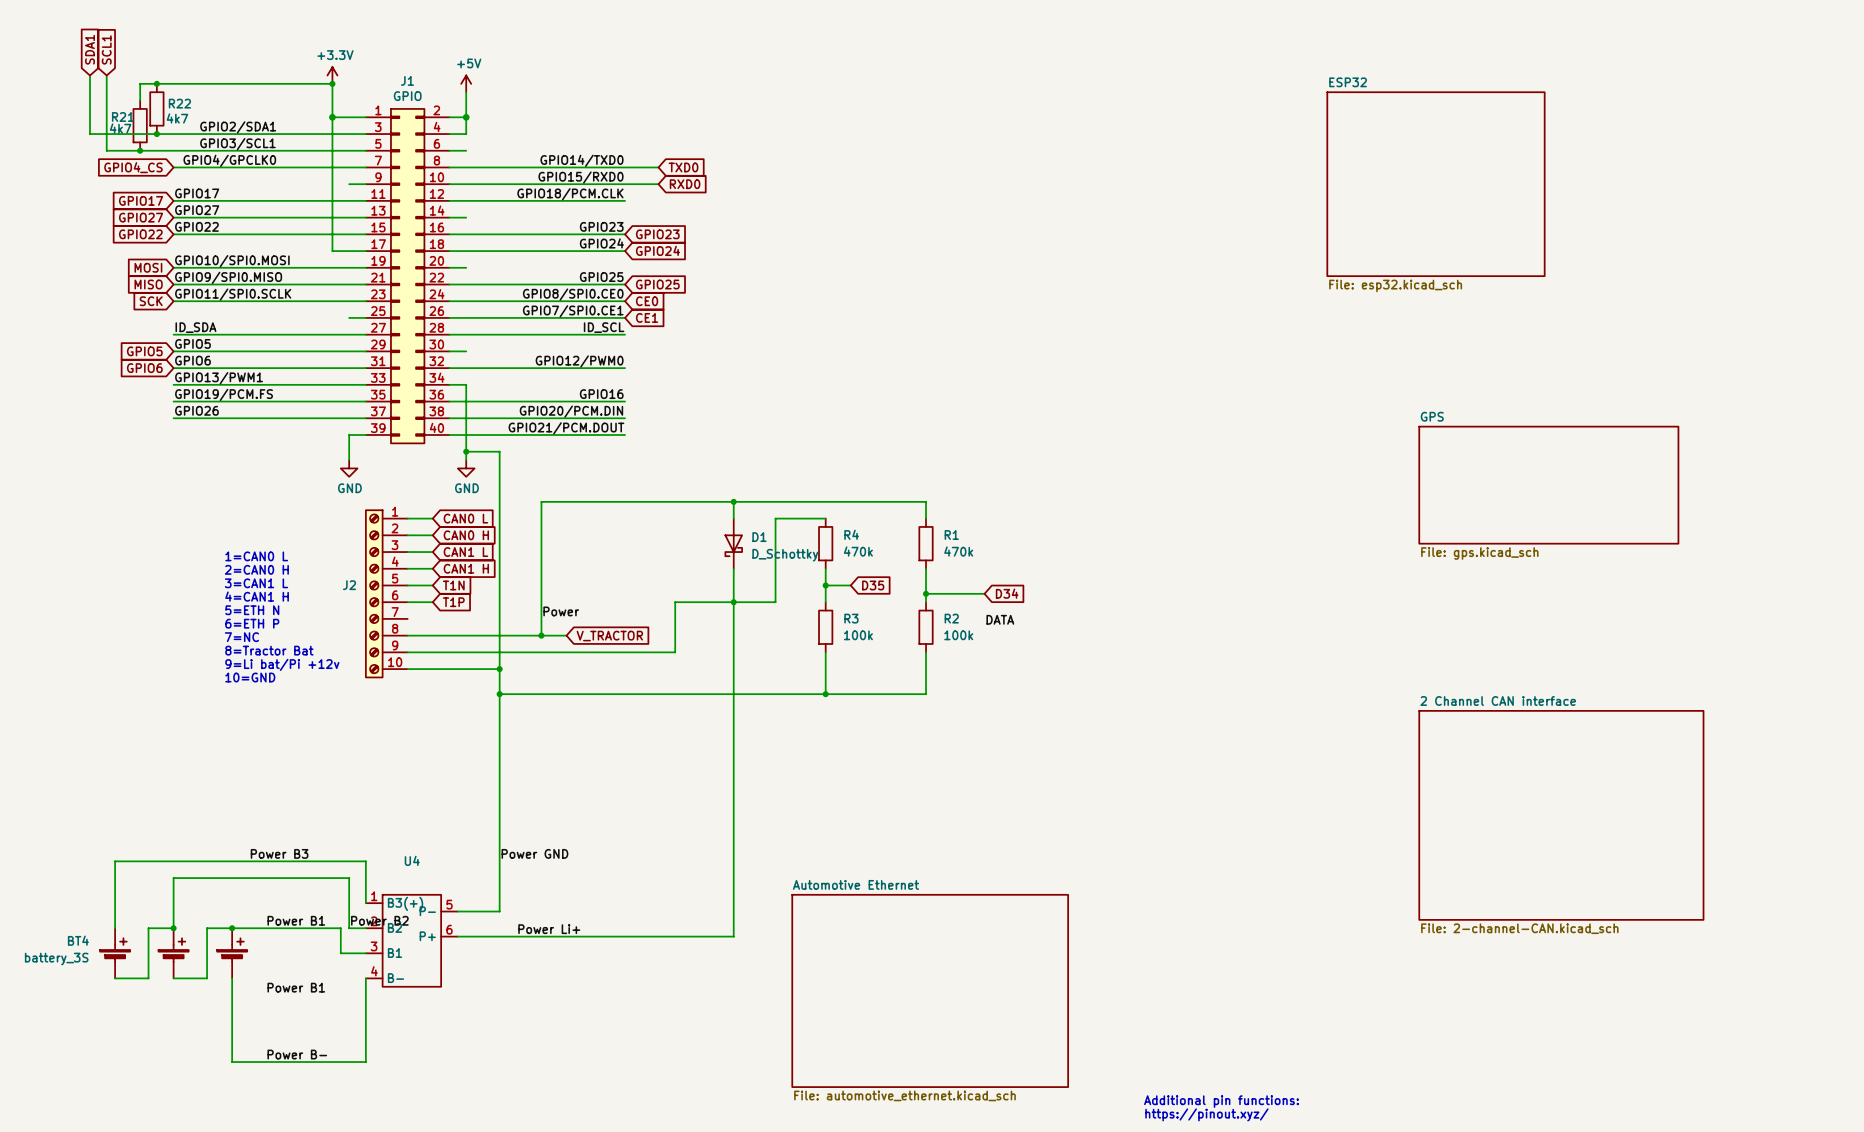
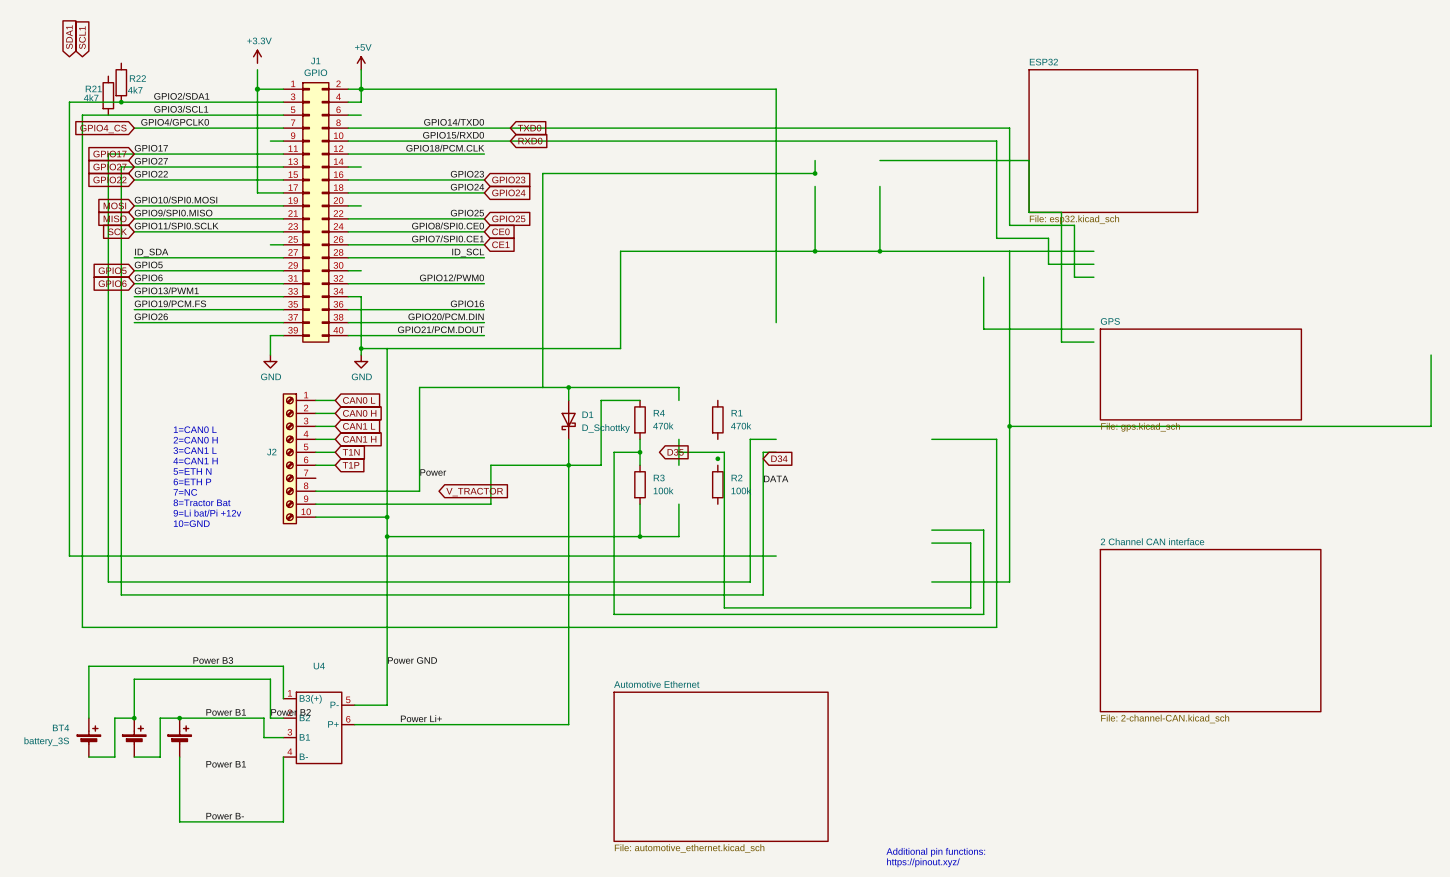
wire: (90, 75) (90, 134) -> (776, 556) (69, 556) (69, 102)
wire: (106, 75) (106, 150) -> (931, 439) (996, 439) (996, 627) (82, 627) (82, 115)
junction: (156, 83) -> none
junction: (332, 83) -> none
wire: (332, 92) (332, 83) (140, 83) (140, 100) -> none
wire: none -> (361, 89) (776, 89) (776, 322)
junction: (140, 150) -> none
wire: none -> (510, 128) (1009, 128) (1009, 225) (1074, 225) (1074, 277) (1093, 277)
wire: none -> (510, 141) (996, 141) (996, 238) (1048, 238) (1048, 264) (1093, 264)
wire: none -> (134, 154) (108, 154) (108, 581) (750, 581) (750, 439) (776, 439)
wire: none -> (815, 160) (815, 173) (542, 173) (542, 387)
wire: none -> (879, 160) (1029, 160) (1029, 212) (1061, 212) (1061, 342) (1093, 342)
wire: none -> (134, 167) (121, 167) (121, 594) (763, 594) (763, 452) (776, 452)
junction: none -> (815, 173)
wire: none -> (815, 186) (815, 251)
wire: none -> (879, 186) (879, 251)
junction: none -> (815, 251)
junction: none -> (879, 251)
wire: none -> (1009, 251) (1009, 581) (931, 581)
wire: none -> (1093, 251) (620, 251) (620, 348) (387, 348)
wire: none -> (983, 277) (983, 329) (1093, 329)
wire: none -> (1431, 355) (1431, 426) (1009, 426)
wire: (875, 501) (926, 501) (926, 518) -> (678, 387) (678, 400)
junction: none -> (1009, 426)
wire: (926, 568) (926, 602) -> (678, 439) (678, 465)
wire: (825, 585) (850, 585) -> (640, 452) (614, 452) (614, 614) (983, 614) (983, 530) (931, 530)
wire: none -> (678, 452) (724, 452) (724, 607) (970, 607) (970, 543) (931, 543)
wire: (926, 593) (984, 593) -> none
wire: (675, 602) (675, 652) (633, 652) -> (523, 465) (490, 465) (490, 504)
wire: (541, 635) (566, 635) -> none
junction: (541, 635) -> none
wire: (926, 652) (926, 694) (875, 694) -> (678, 504) (678, 536)

